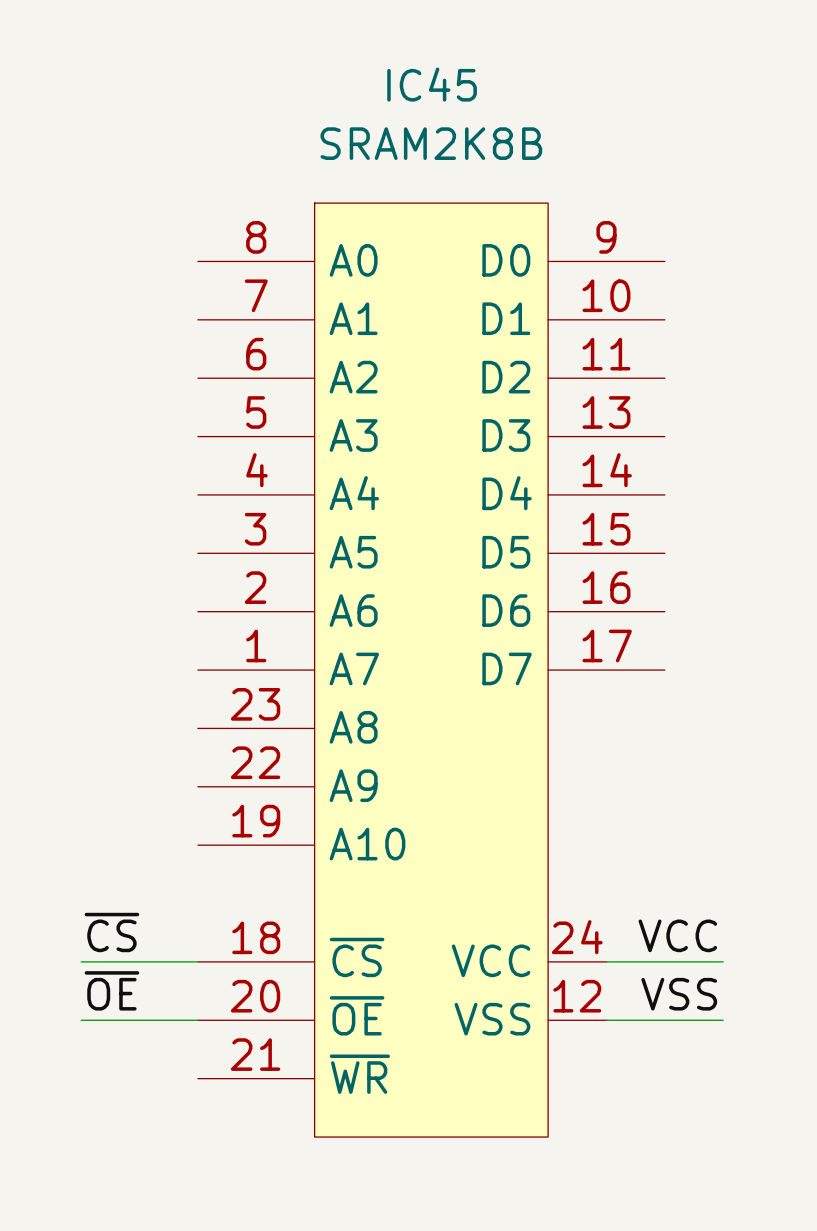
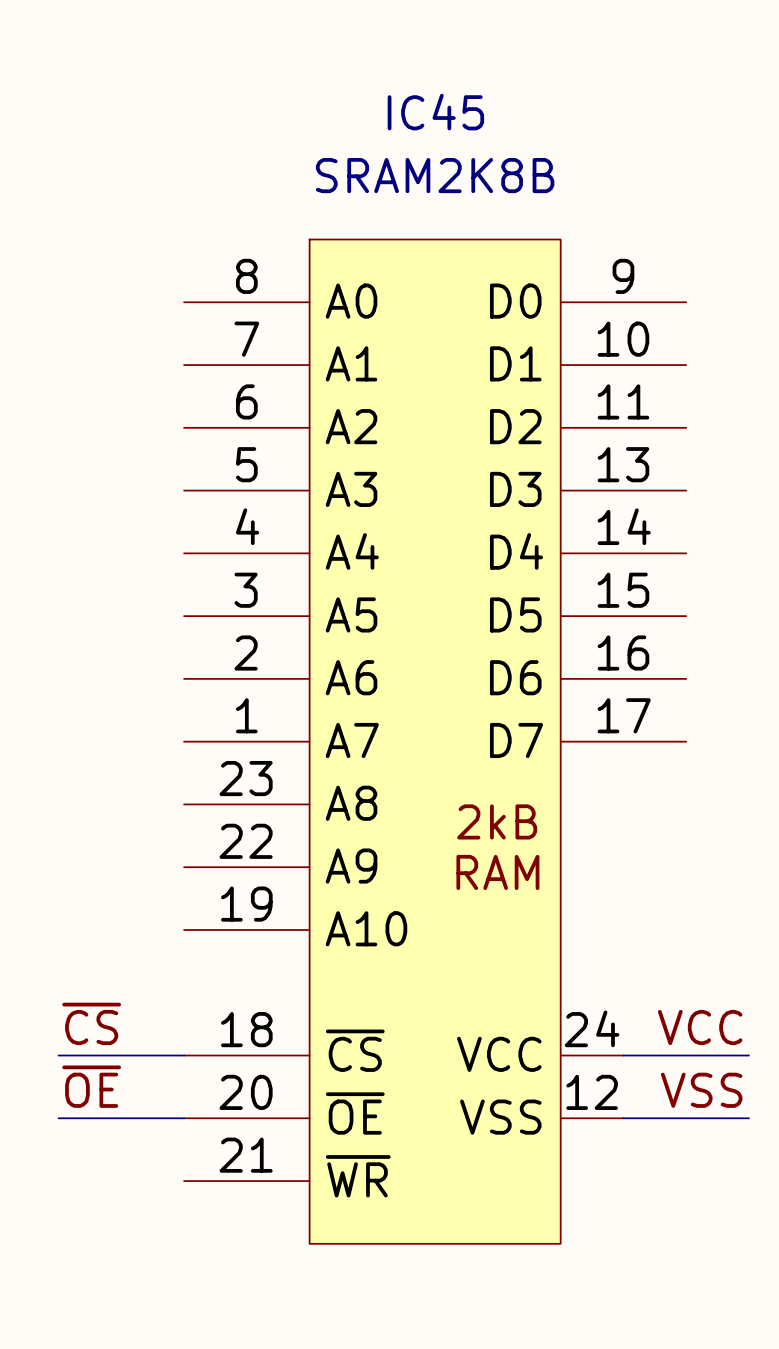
IC45 text: none -> 2kB (497, 821)
IC45 text: none -> RAM (497, 872)

